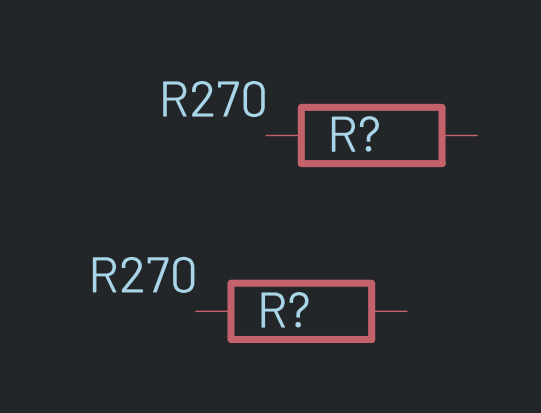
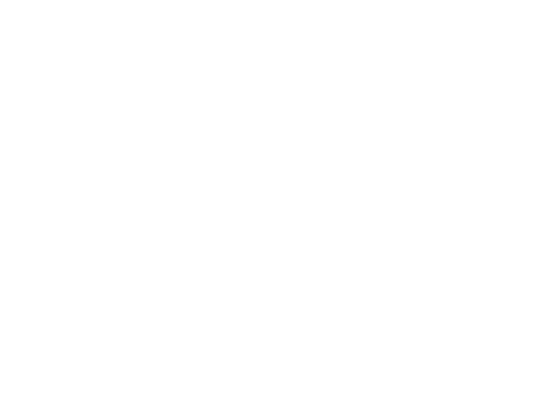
R?: R270 (371, 135) -> none
R?: R270 (301, 311) -> none

